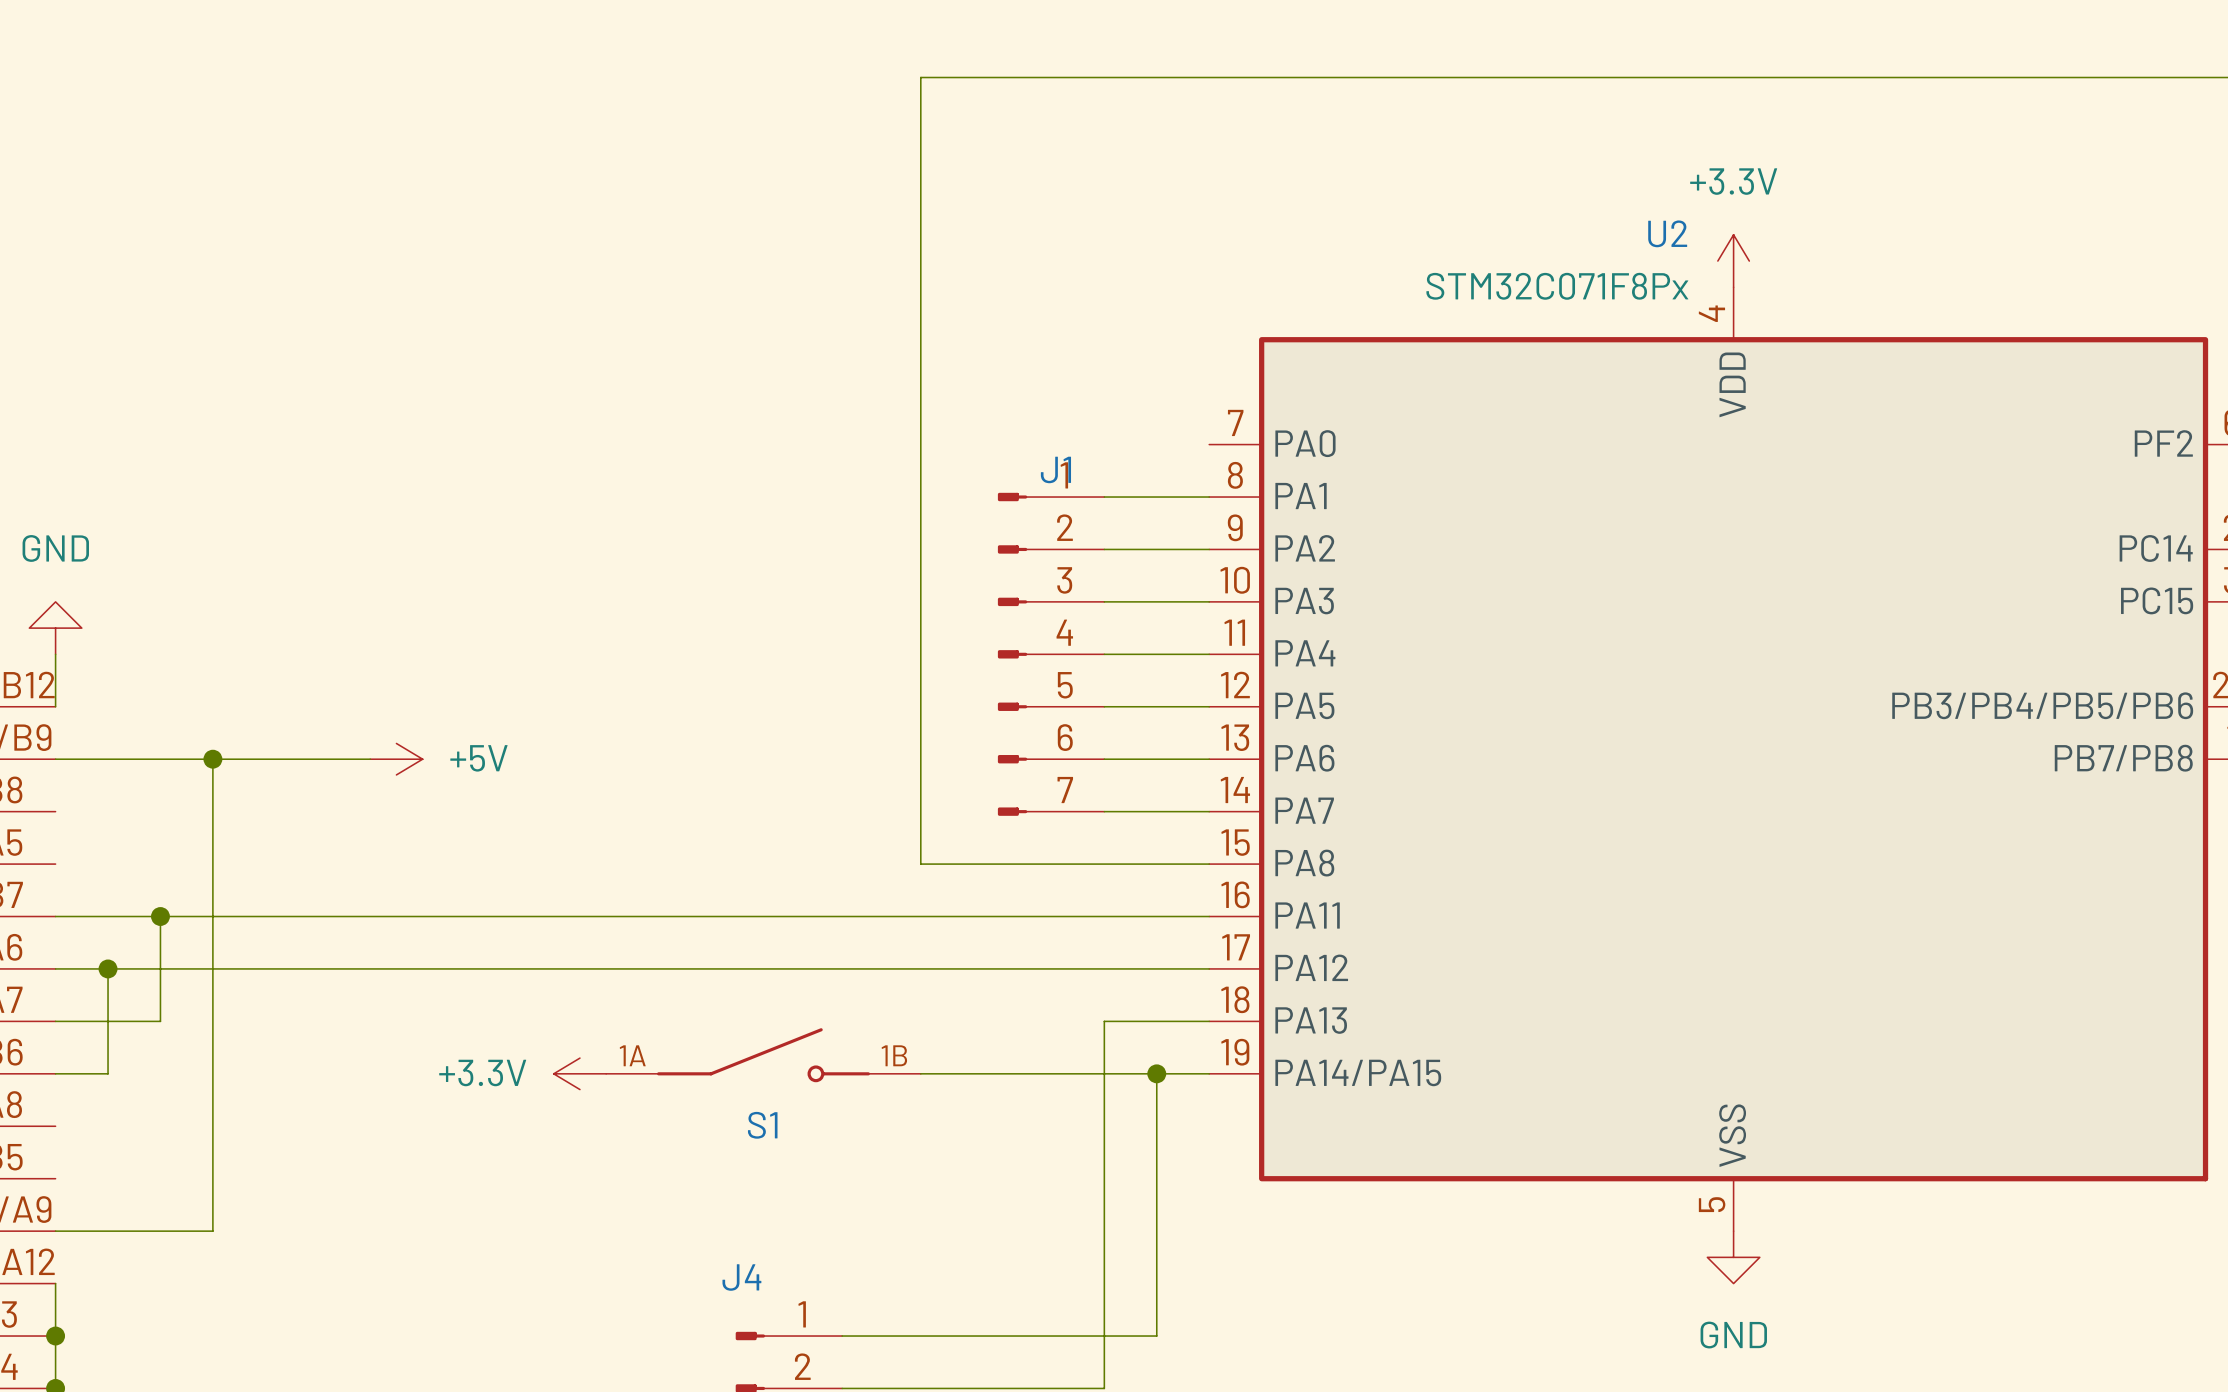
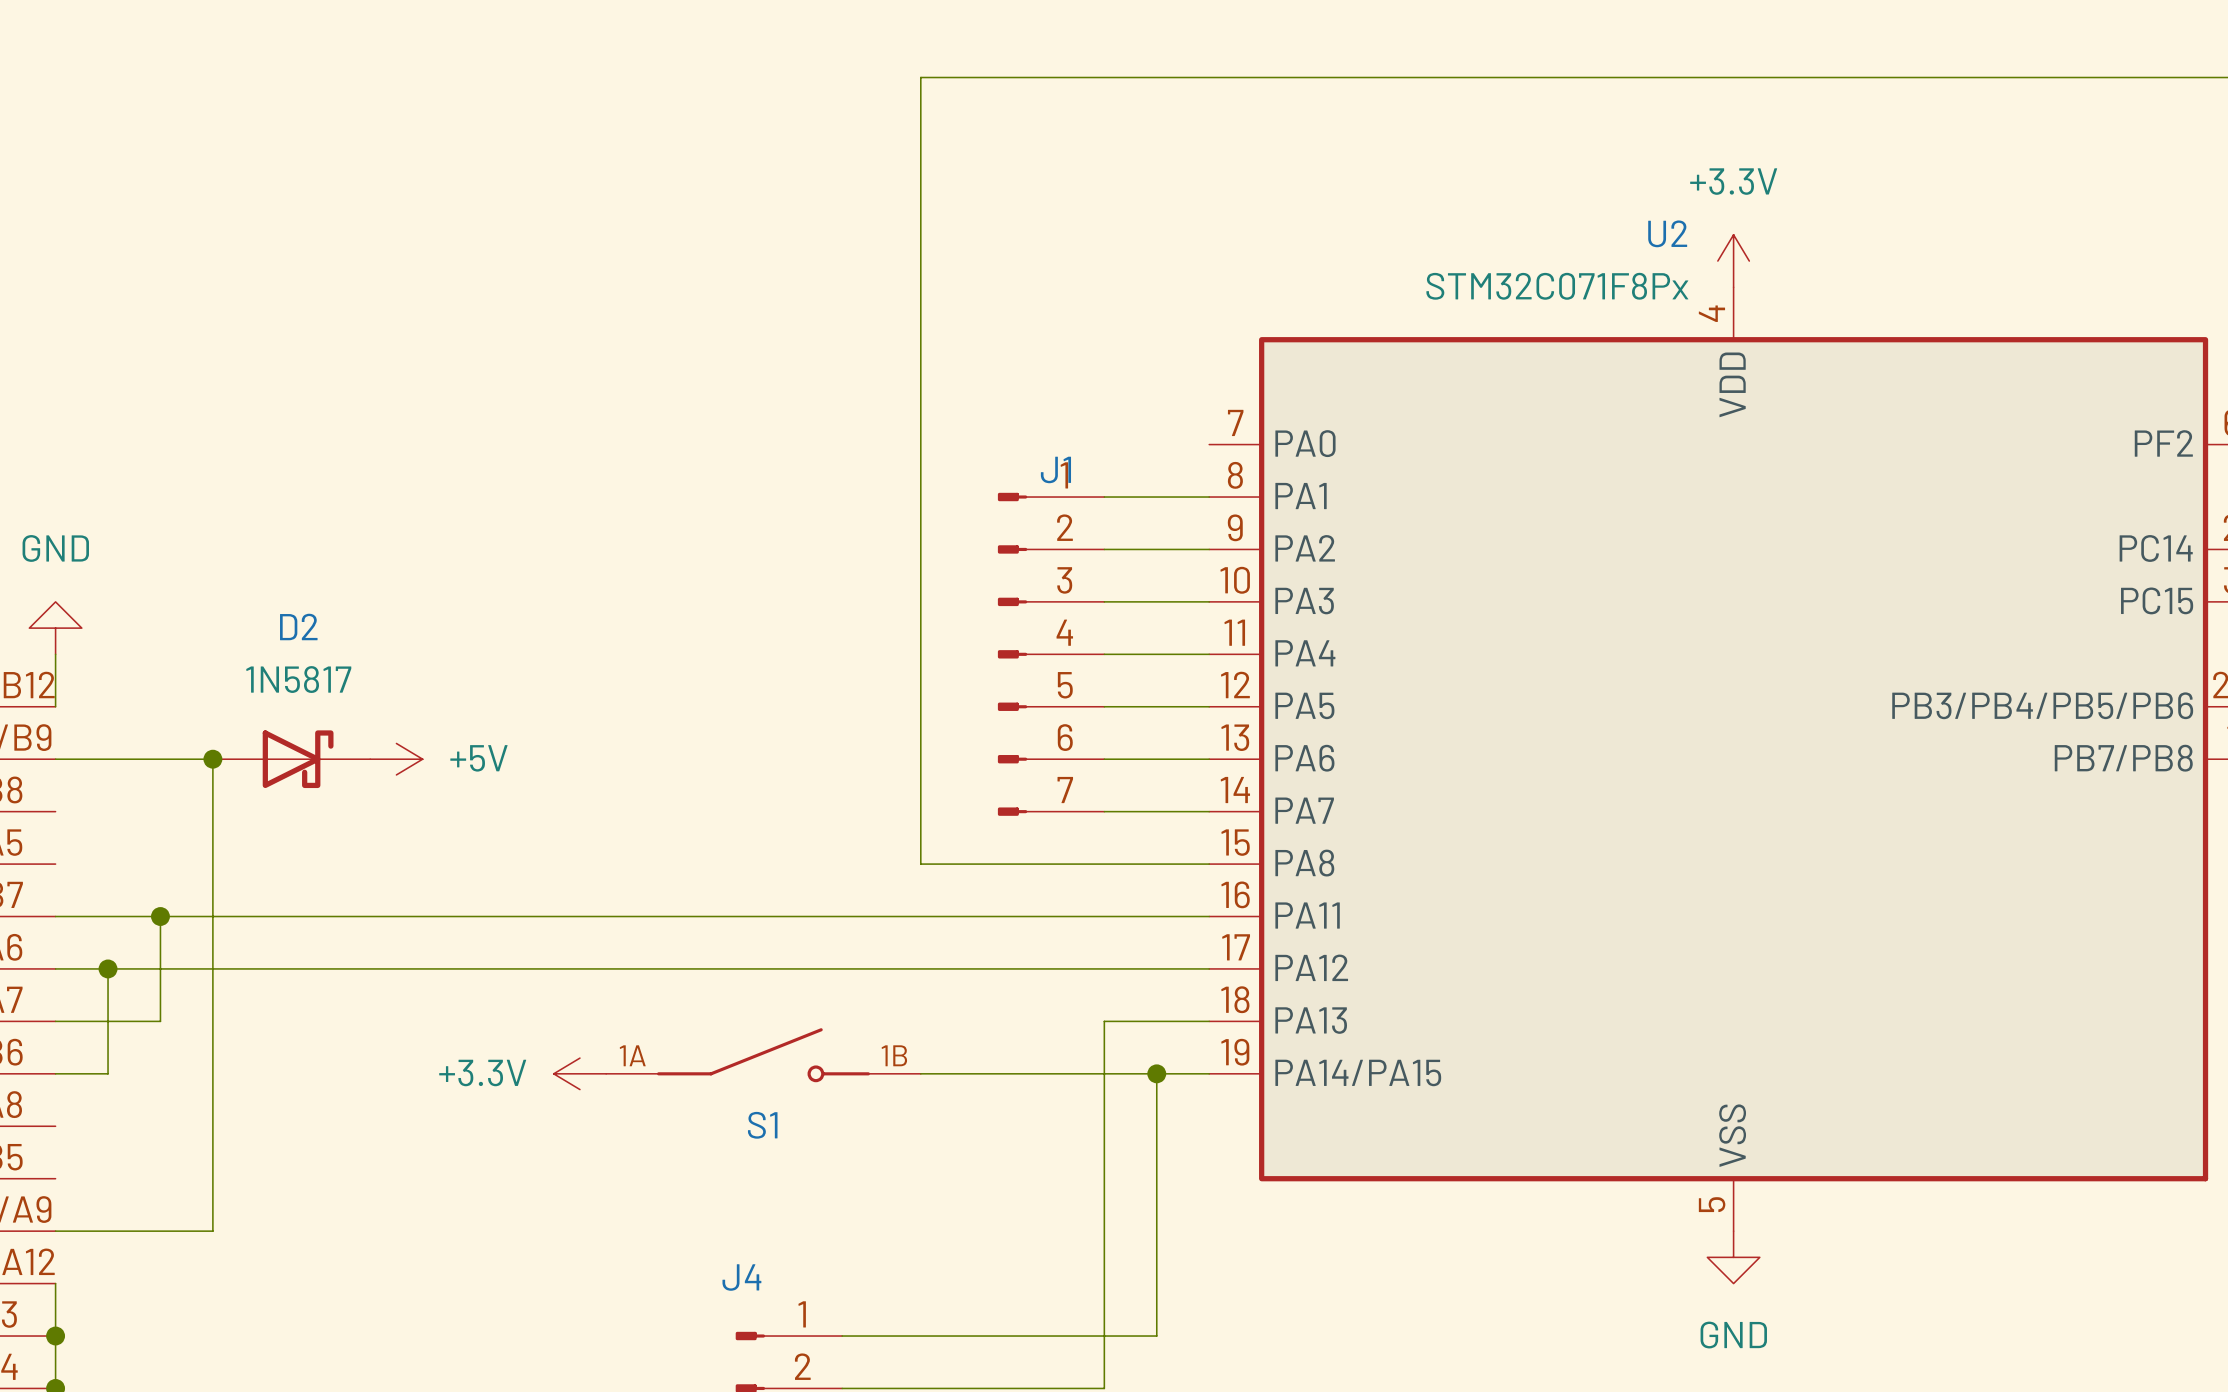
D2: none -> 1N5817 (291, 759)

